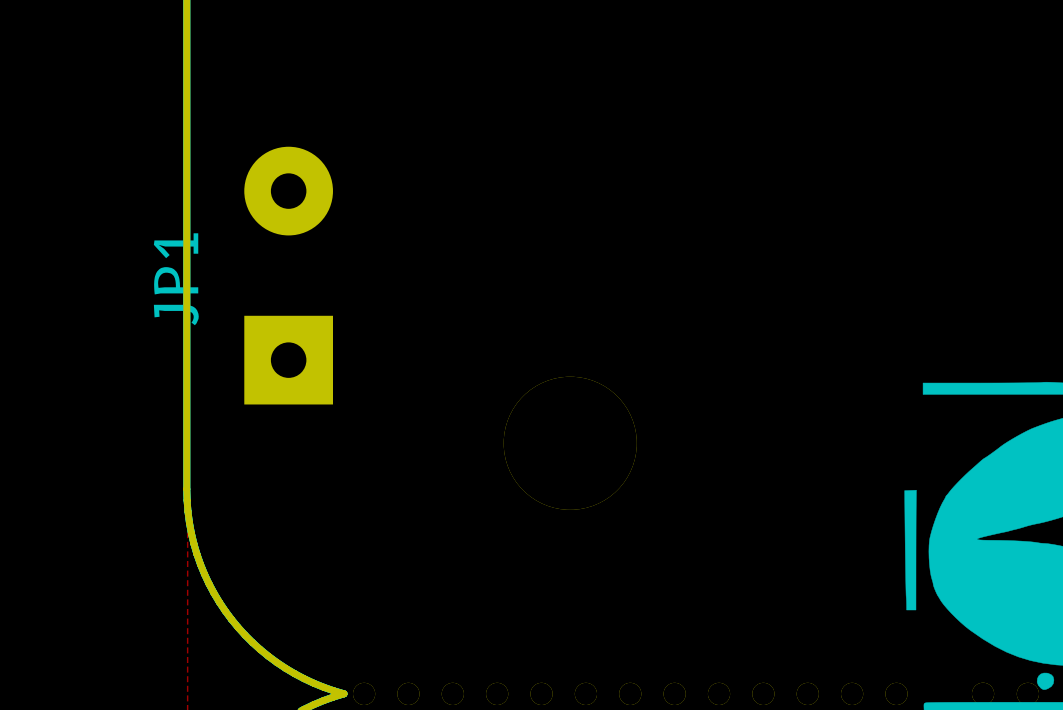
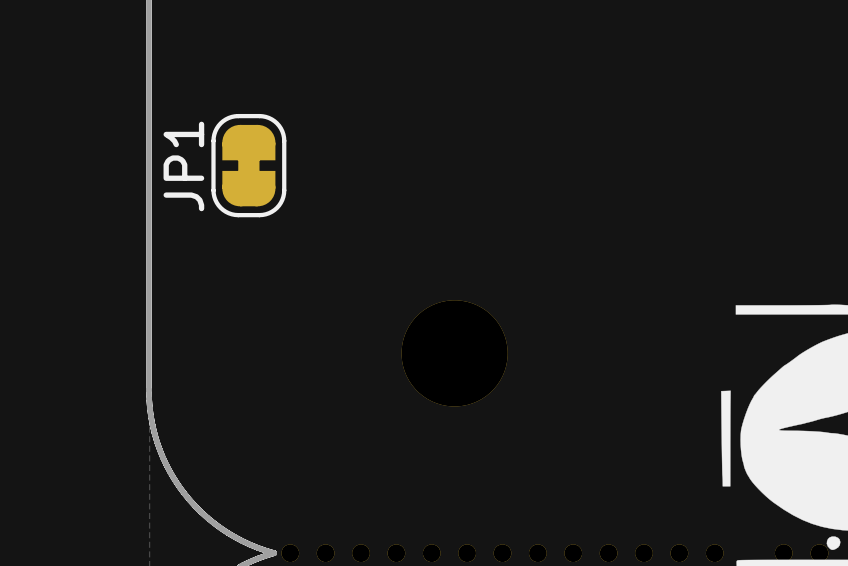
JP1 footprint: [244, 146, 333, 405] -> [211, 113, 287, 218]

